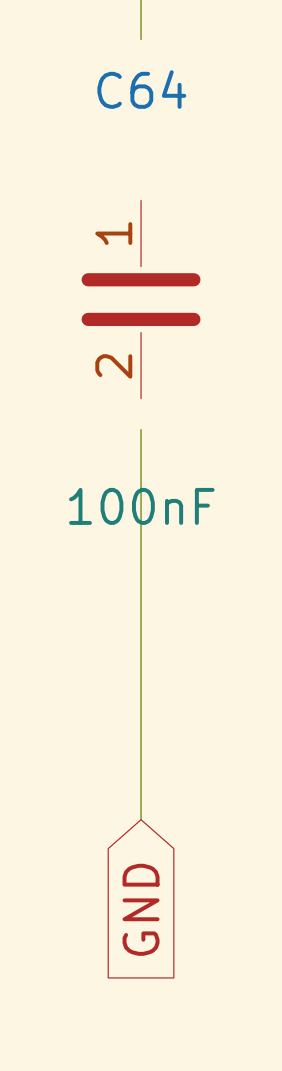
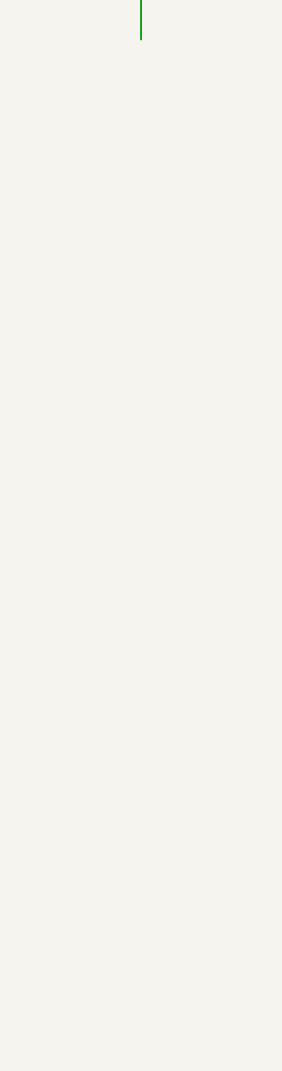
C64: 100nF (141, 299) -> none
wire: (141, 429) (141, 819) -> none
global label: GND (141, 909) -> none

